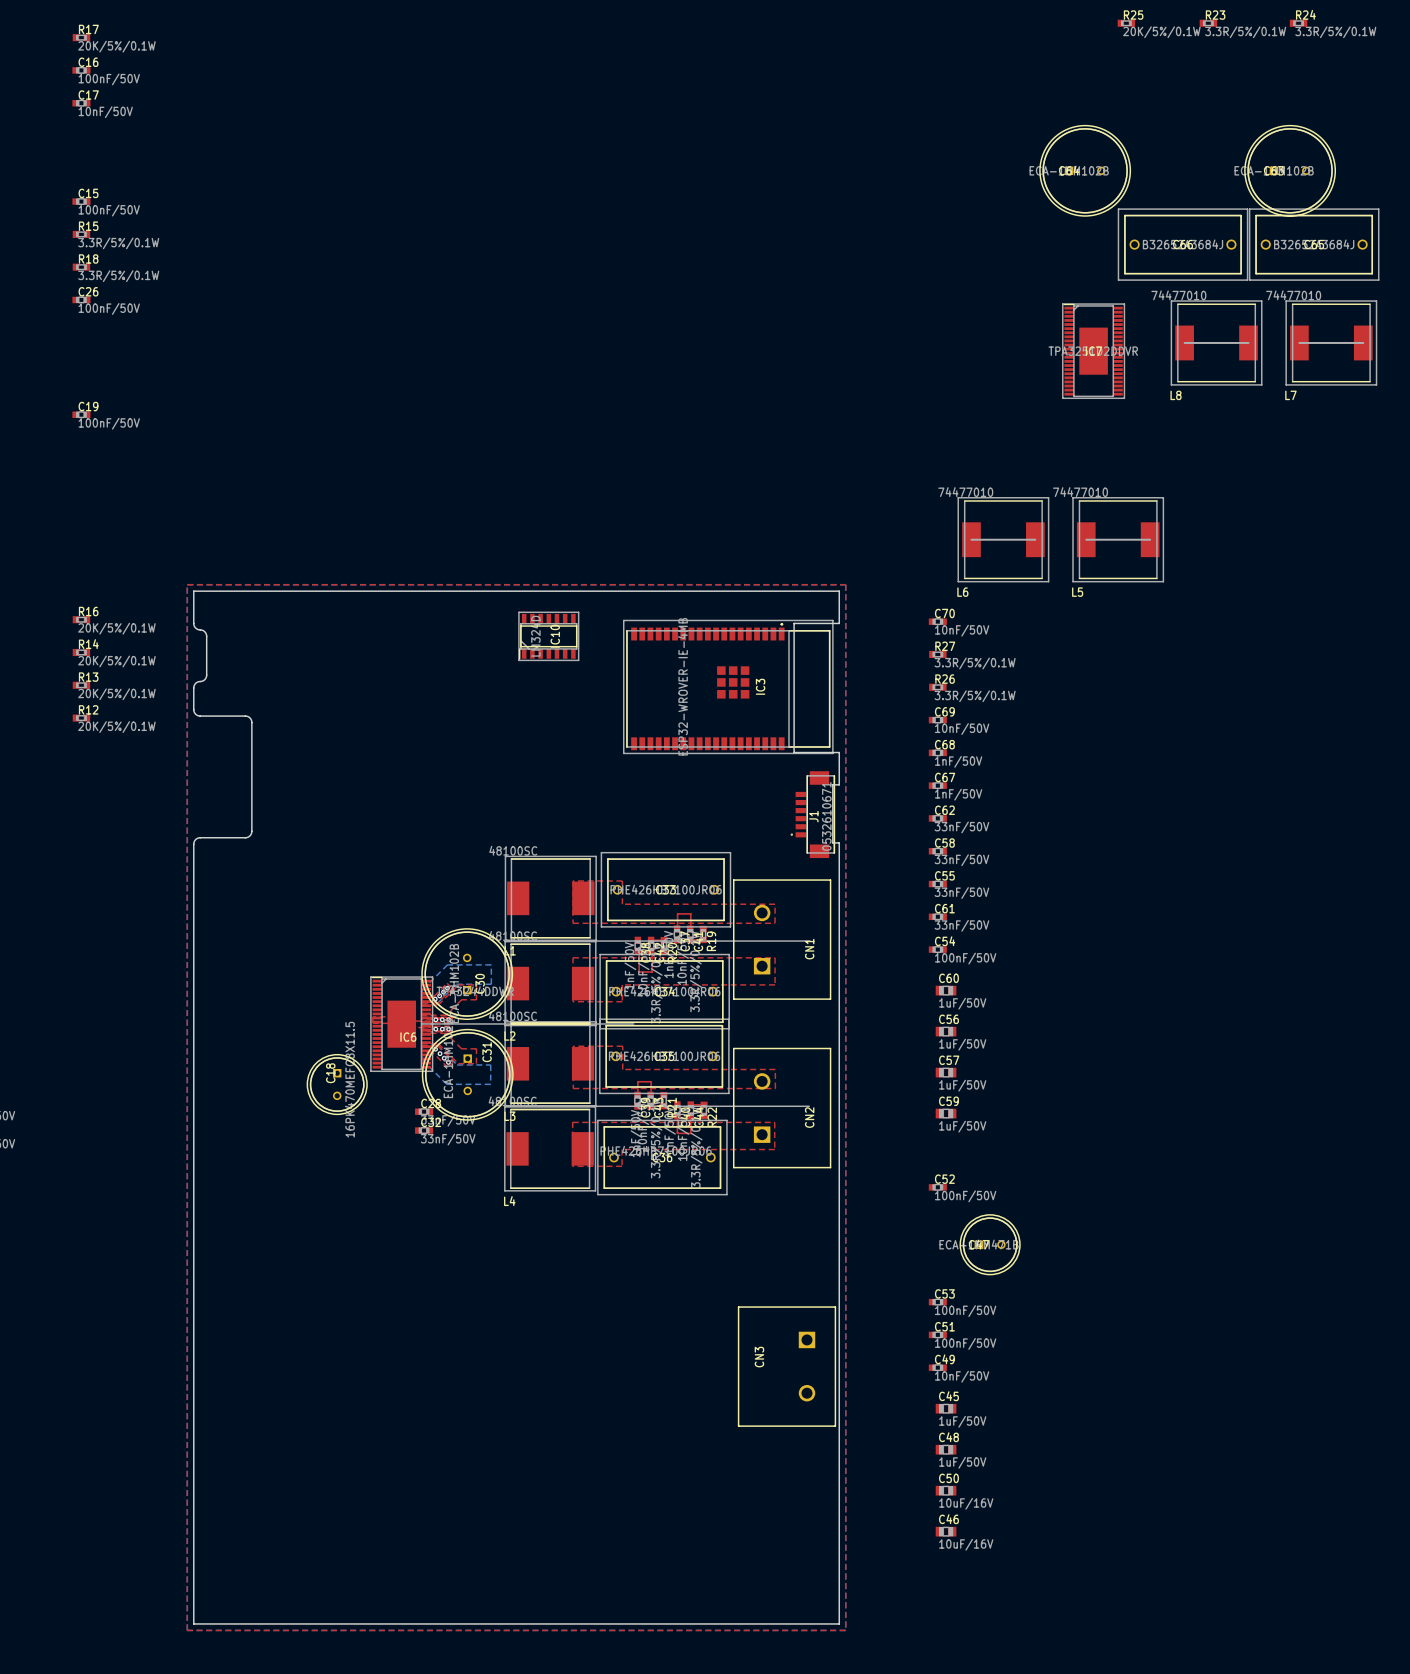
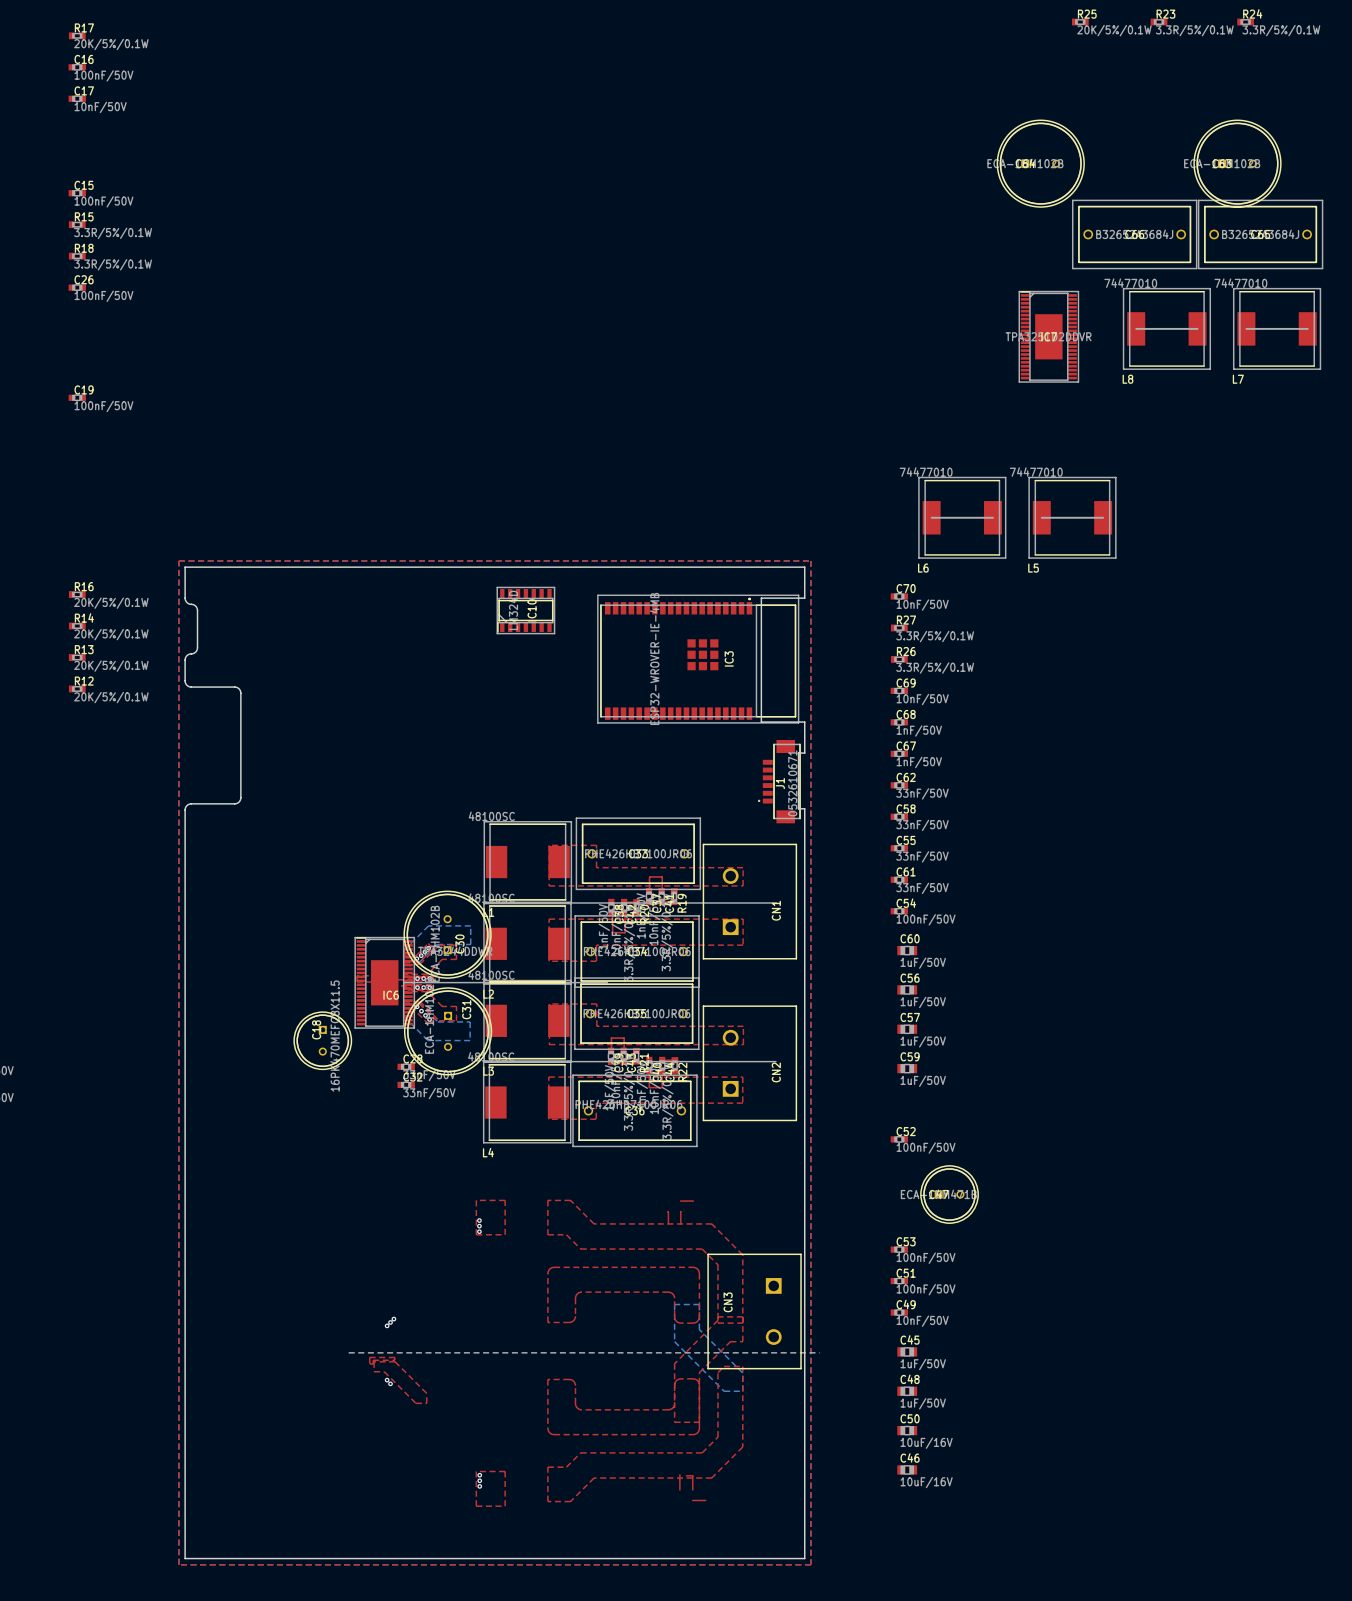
top zone outline: none -> (476, 1200) (505, 1200) (505, 1234) (476, 1234) (476, 1200)
top track: none -> (680, 1201) (693, 1201)
top track: none -> (667, 1211) (668, 1223)
top track: none -> (680, 1211) (680, 1223)
via: none -> (479, 1220)
via: none -> (479, 1226)
via: none -> (479, 1231)
top zone outline: none -> (554, 1267) (550, 1268) (547, 1272) (547, 1322) (570, 1322) (573, 1320) (575, 1296) (581, 1292) (670, 1292) (674, 1296) (676, 1321) (694, 1323) (698, 1319) (699, 1273) (695, 1267) (554, 1267)
bottom zone outline: none -> (674, 1304) (699, 1304) (699, 1329) (742, 1372) (742, 1391) (724, 1391) (674, 1341) (674, 1304)
top zone outline: none -> (717, 1316) (742, 1316)
via: none -> (393, 1319)
top zone outline: none -> (717, 1320) (674, 1363) (674, 1422) (699, 1422)
via: none -> (390, 1322)
top zone outline: none -> (742, 1323) (717, 1323) (717, 1264) (702, 1249) (580, 1249) (566, 1234) (547, 1234) (547, 1200) (570, 1200) (594, 1223) (711, 1223) (742, 1254) (742, 1341) (730, 1341) (699, 1372) (699, 1428) (697, 1432) (693, 1434) (554, 1434) (548, 1430) (547, 1379) (570, 1379) (573, 1381) (575, 1405) (580, 1409) (668, 1409) (672, 1408) (674, 1403)
via: none -> (387, 1325)
line: none -> (348, 1352) (819, 1352)
top zone outline: none -> (369, 1357) (394, 1357) (394, 1360) (373, 1360) (373, 1363) (369, 1363) (369, 1357)
top zone outline: none -> (374, 1361) (395, 1361) (426, 1393) (426, 1403) (415, 1403) (384, 1371) (374, 1371) (374, 1361)
top zone outline: none -> (724, 1366) (717, 1372) (717, 1437) (702, 1452) (580, 1452) (566, 1467) (547, 1467) (547, 1501) (570, 1501) (594, 1478) (711, 1478) (742, 1447) (742, 1366) (724, 1366)
via: none -> (387, 1380)
via: none -> (390, 1383)
top zone outline: none -> (674, 1385) (676, 1380) (680, 1378) (694, 1379) (699, 1385)
top zone outline: none -> (476, 1471) (476, 1506) (505, 1506) (505, 1471) (476, 1471)
top track: none -> (679, 1474) (679, 1489)
via: none -> (479, 1475)
top track: none -> (686, 1475) (692, 1475) (692, 1489)
via: none -> (479, 1480)
via: none -> (479, 1486)
top track: none -> (692, 1500) (705, 1500)

